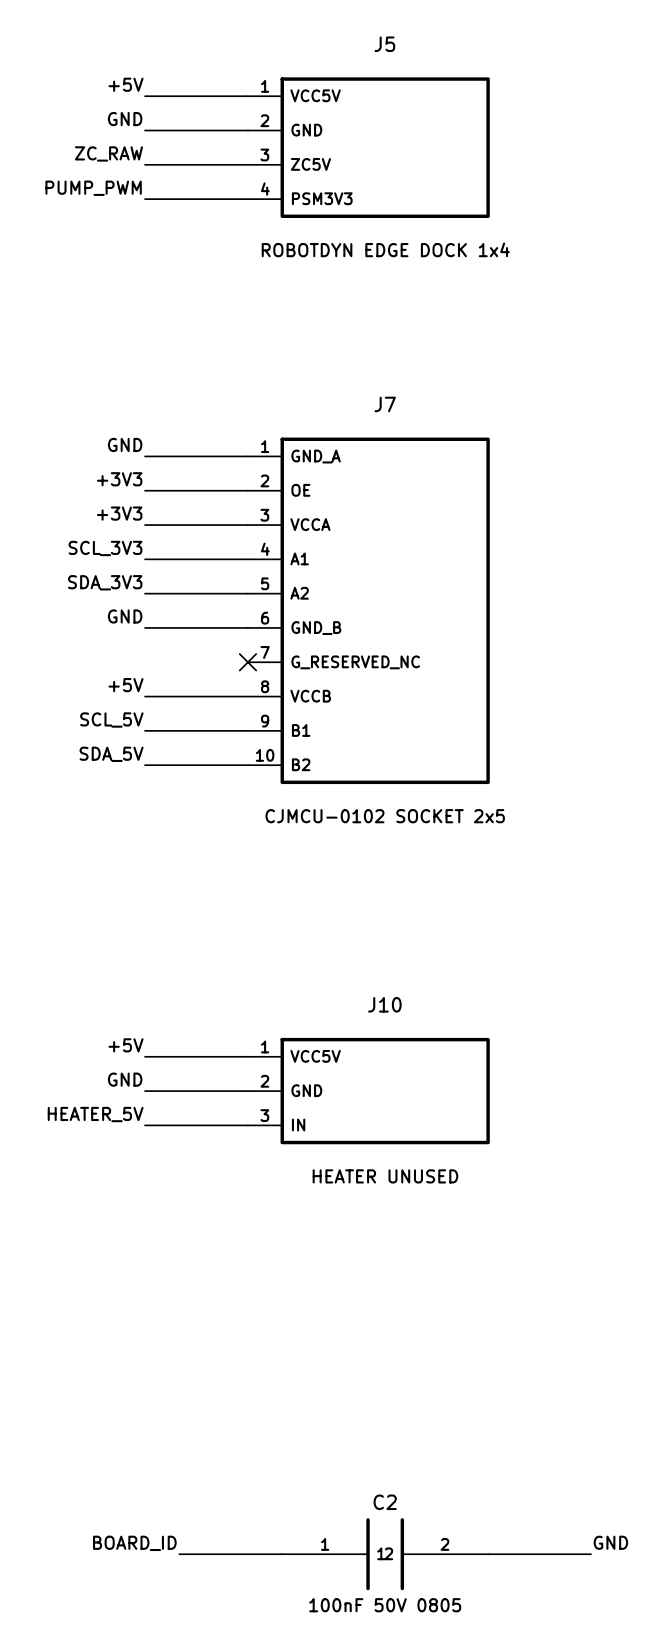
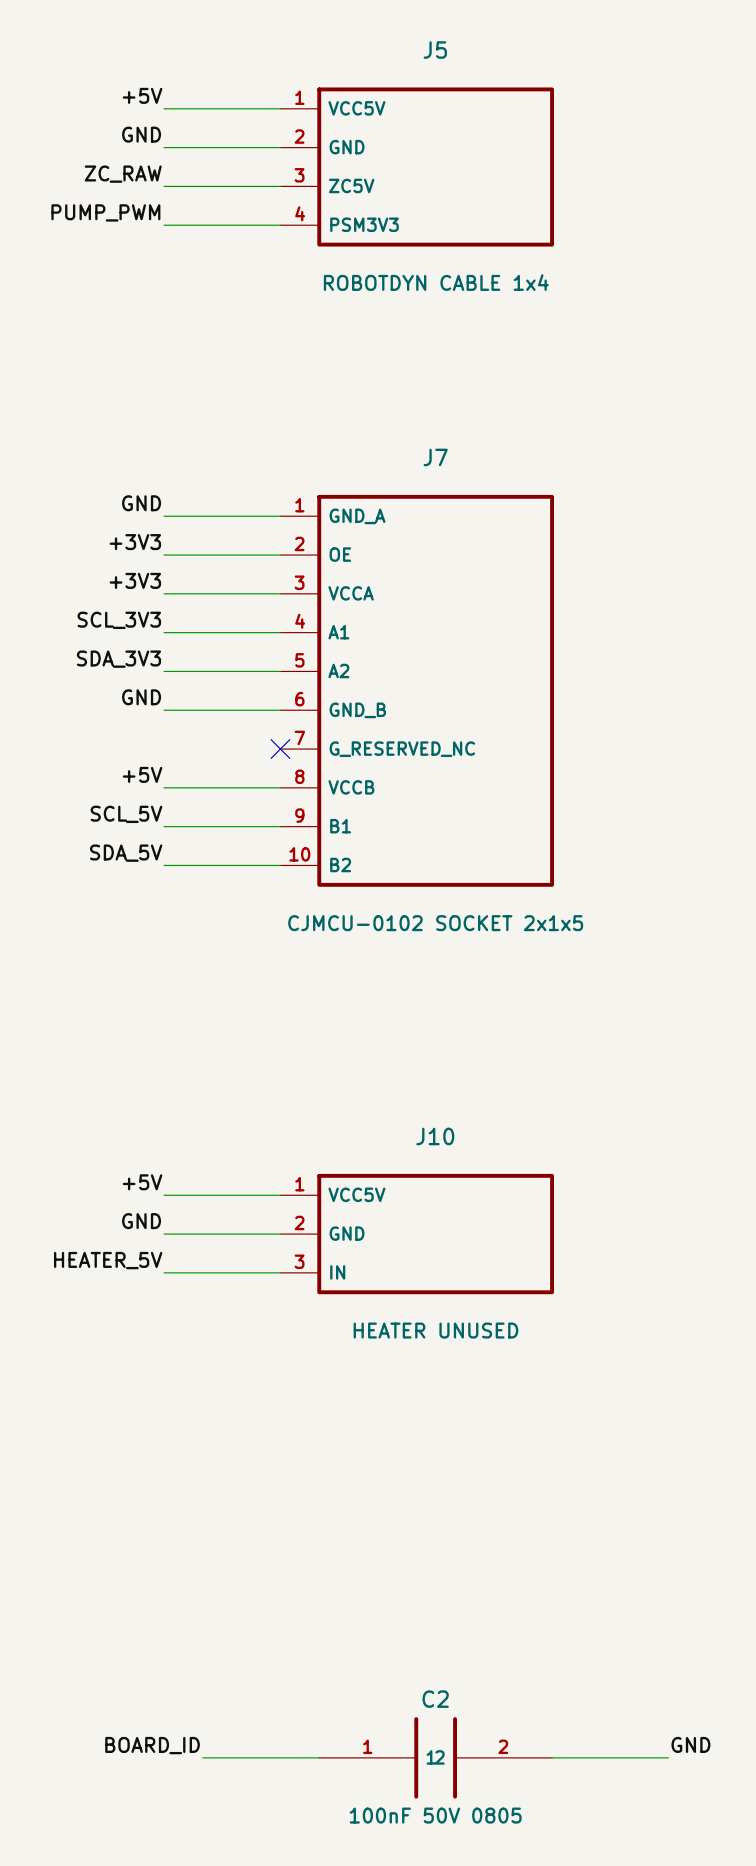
J5 value: ROBOTDYN EDGE DOCK 1x4 (385, 249) -> ROBOTDYN CABLE 1x4 (436, 282)
J7 value: CJMCU-0102 SOCKET 2x5 (385, 816) -> CJMCU-0102 SOCKET 2x1x5 (435, 923)

